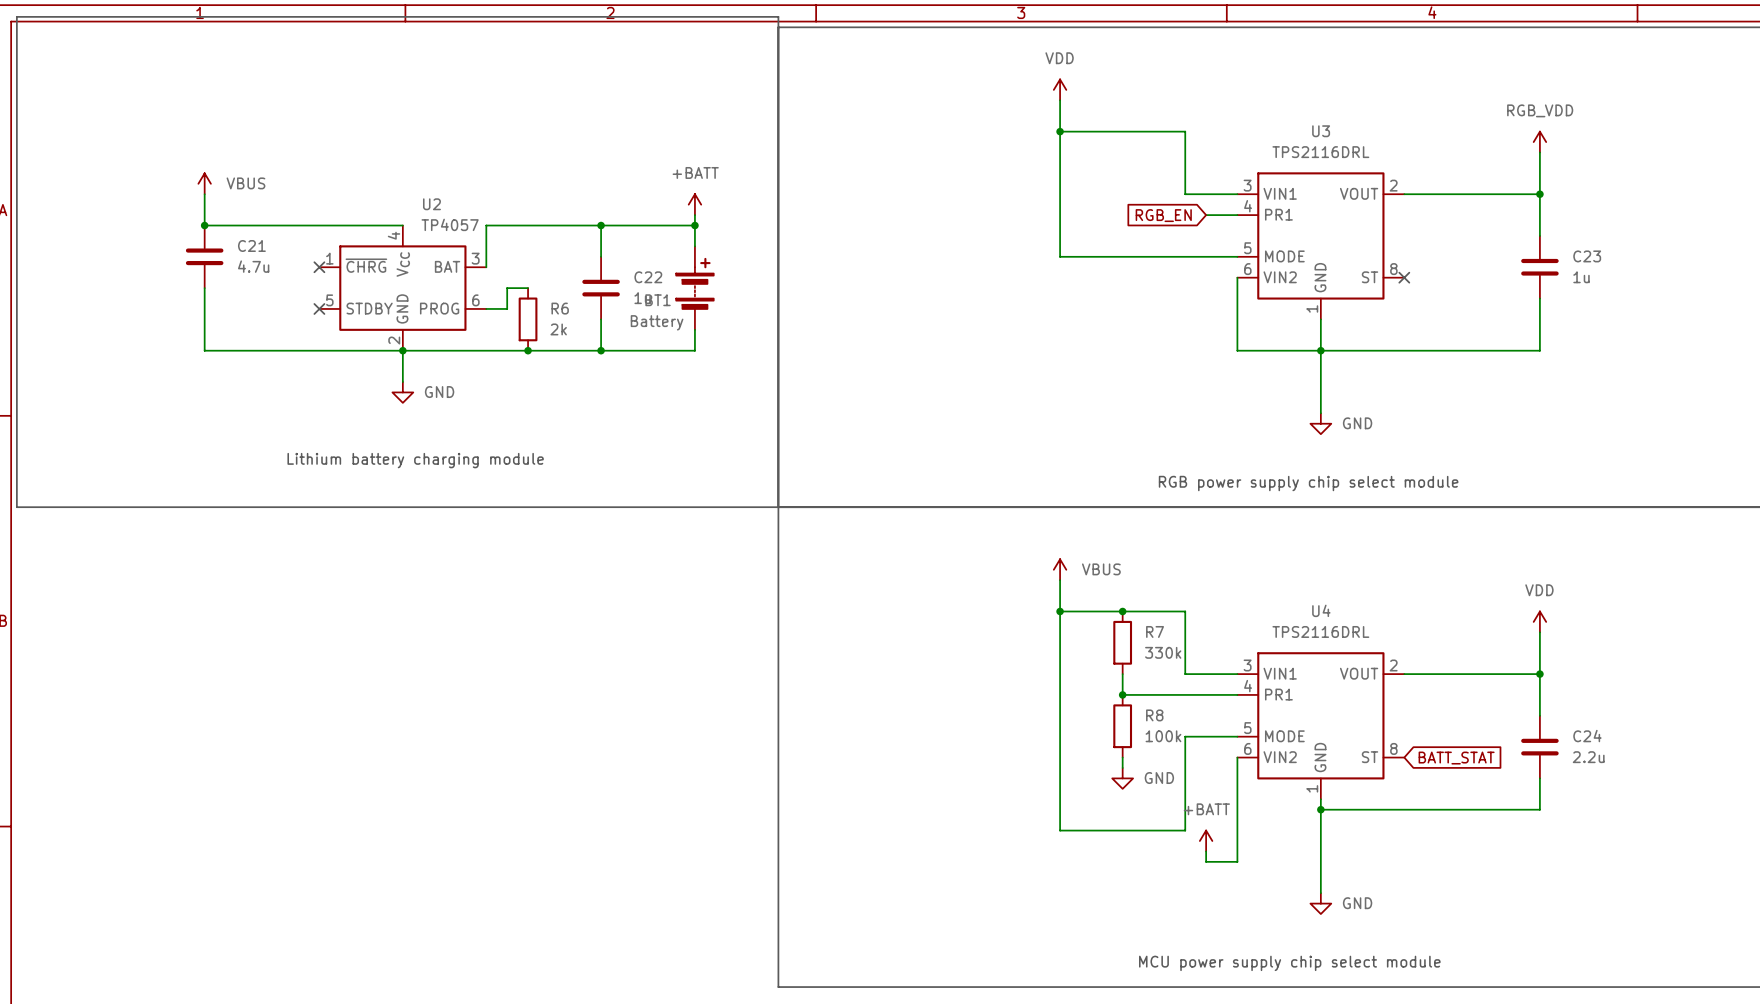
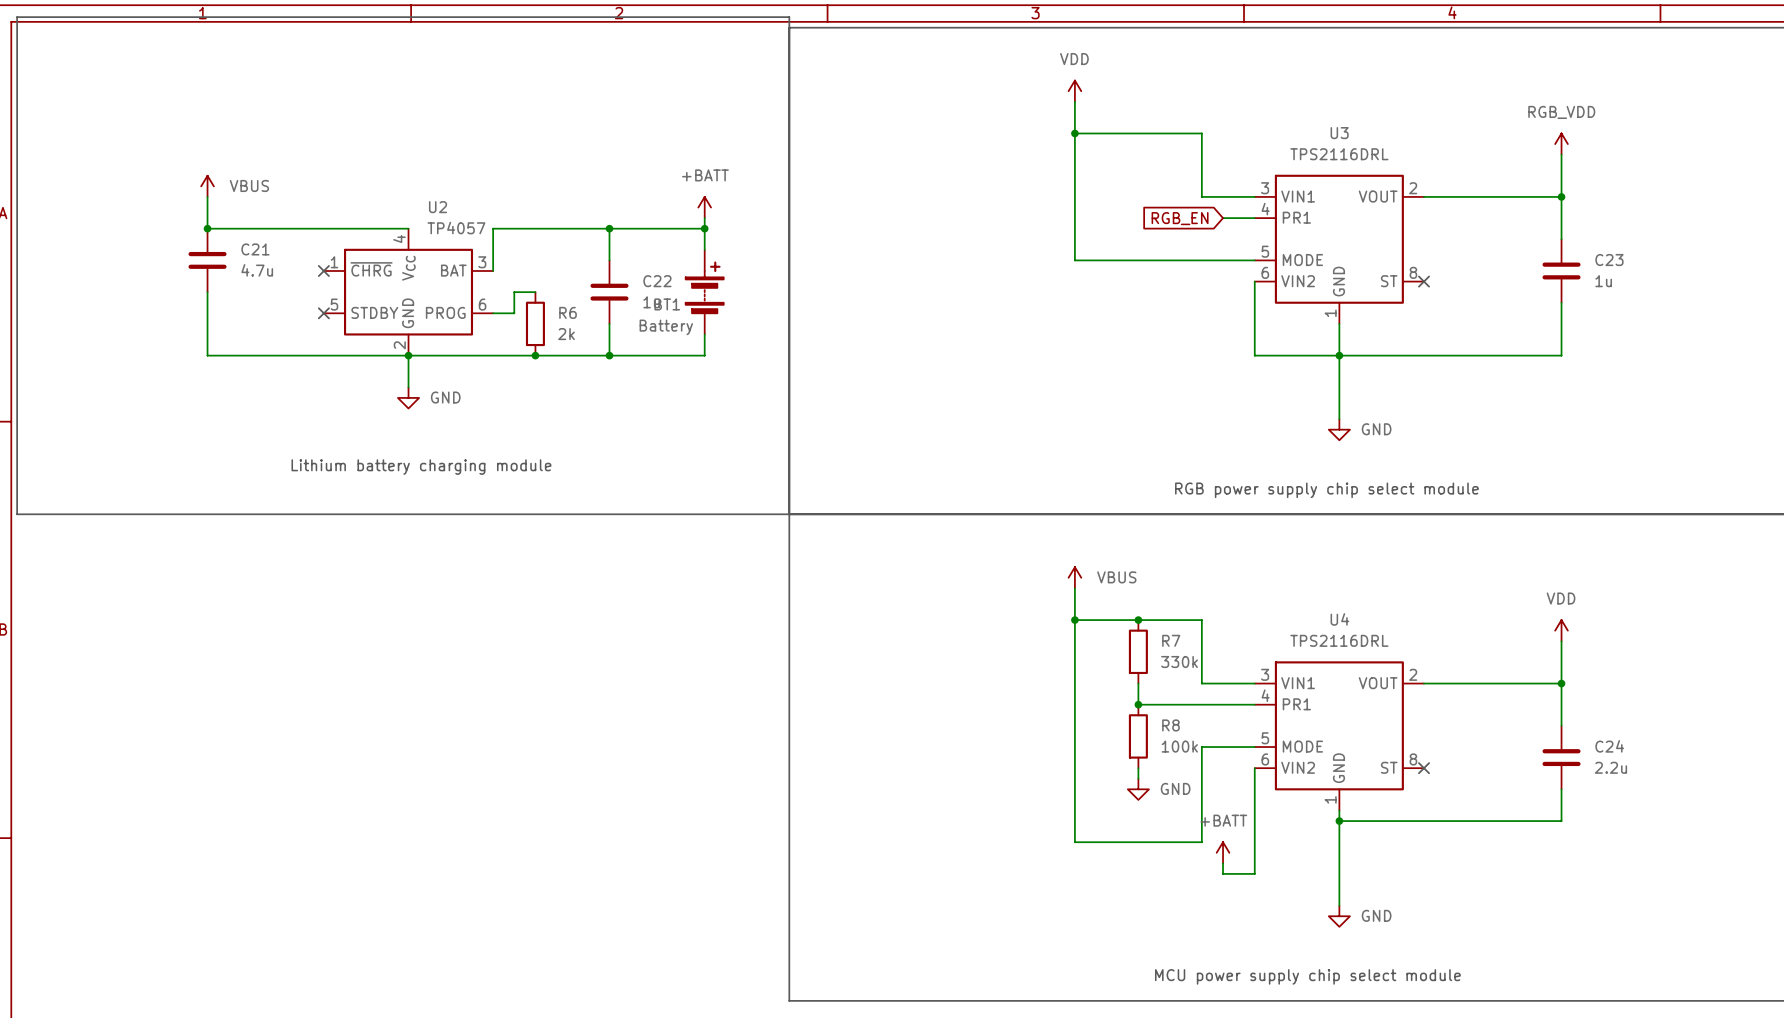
no-connect mark: none -> (1424, 768)
global label: BATT_STAT (1456, 758) -> none

